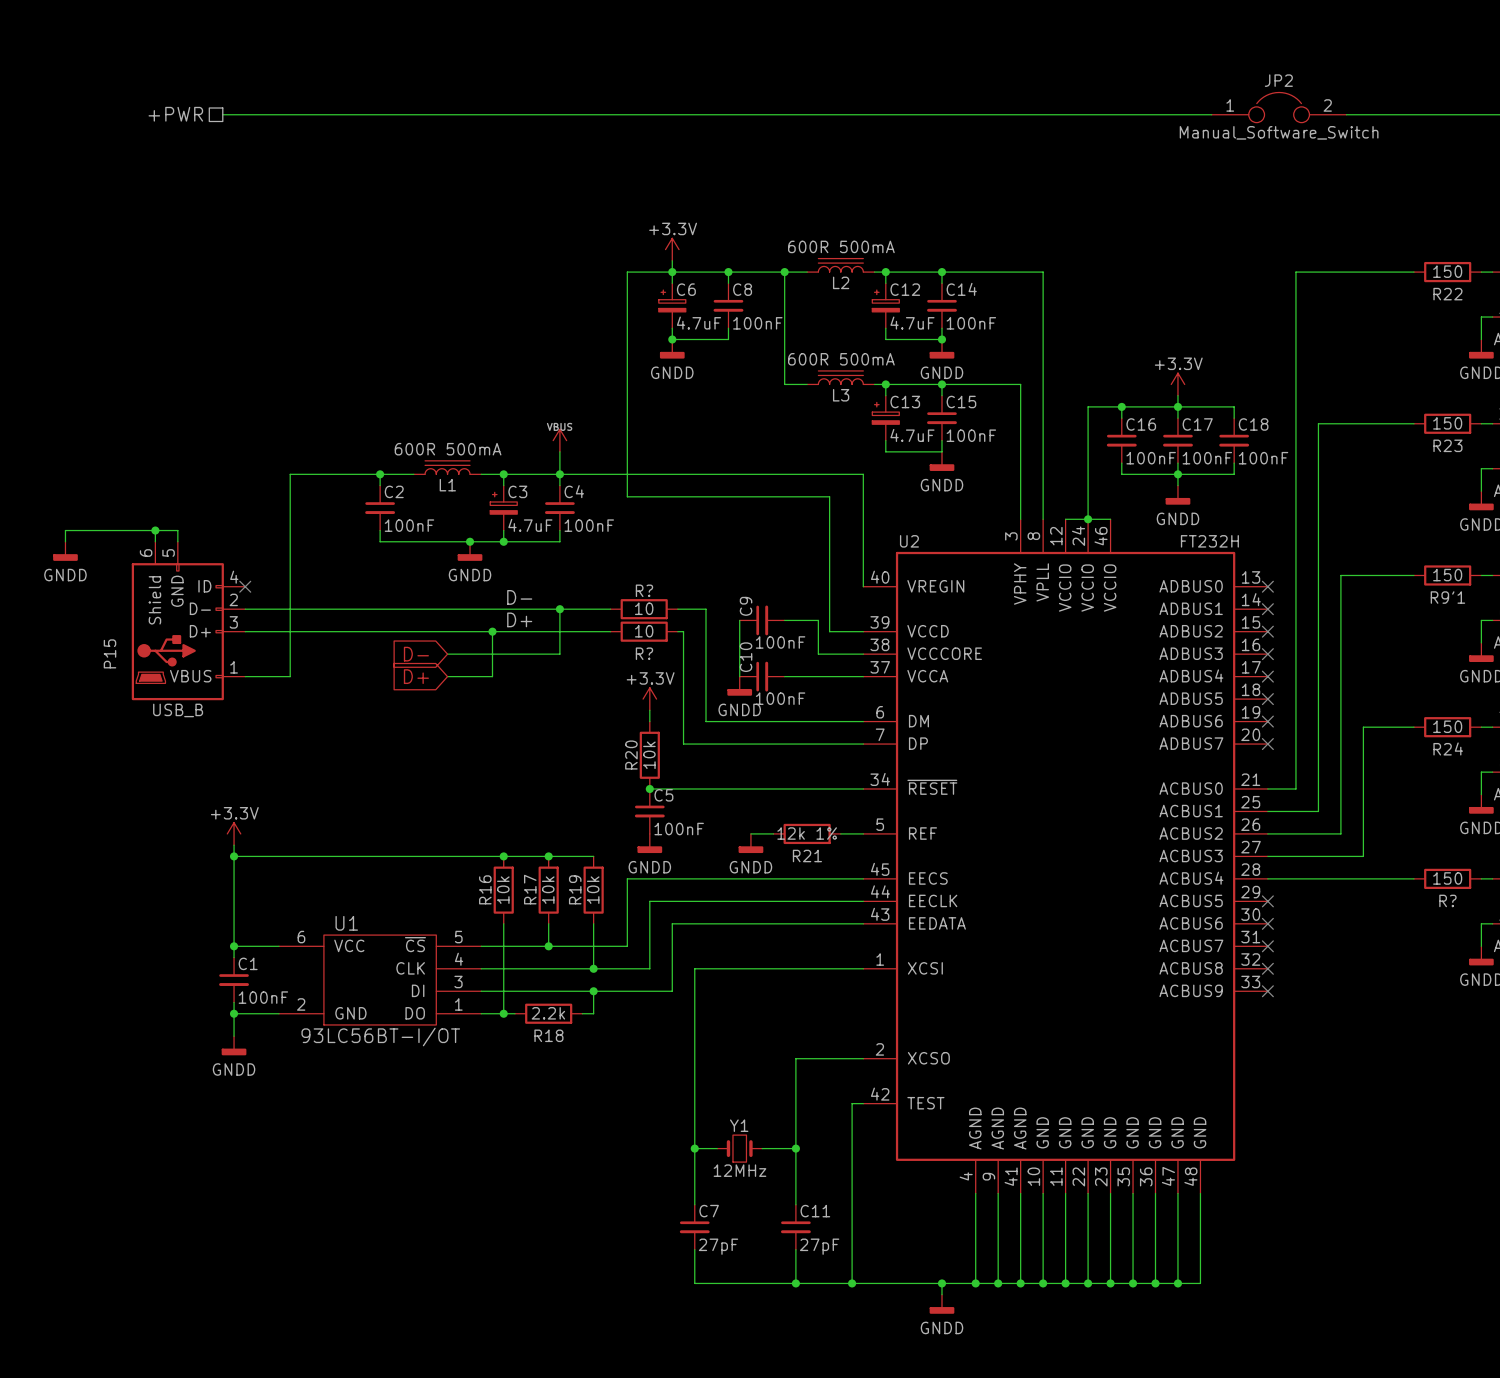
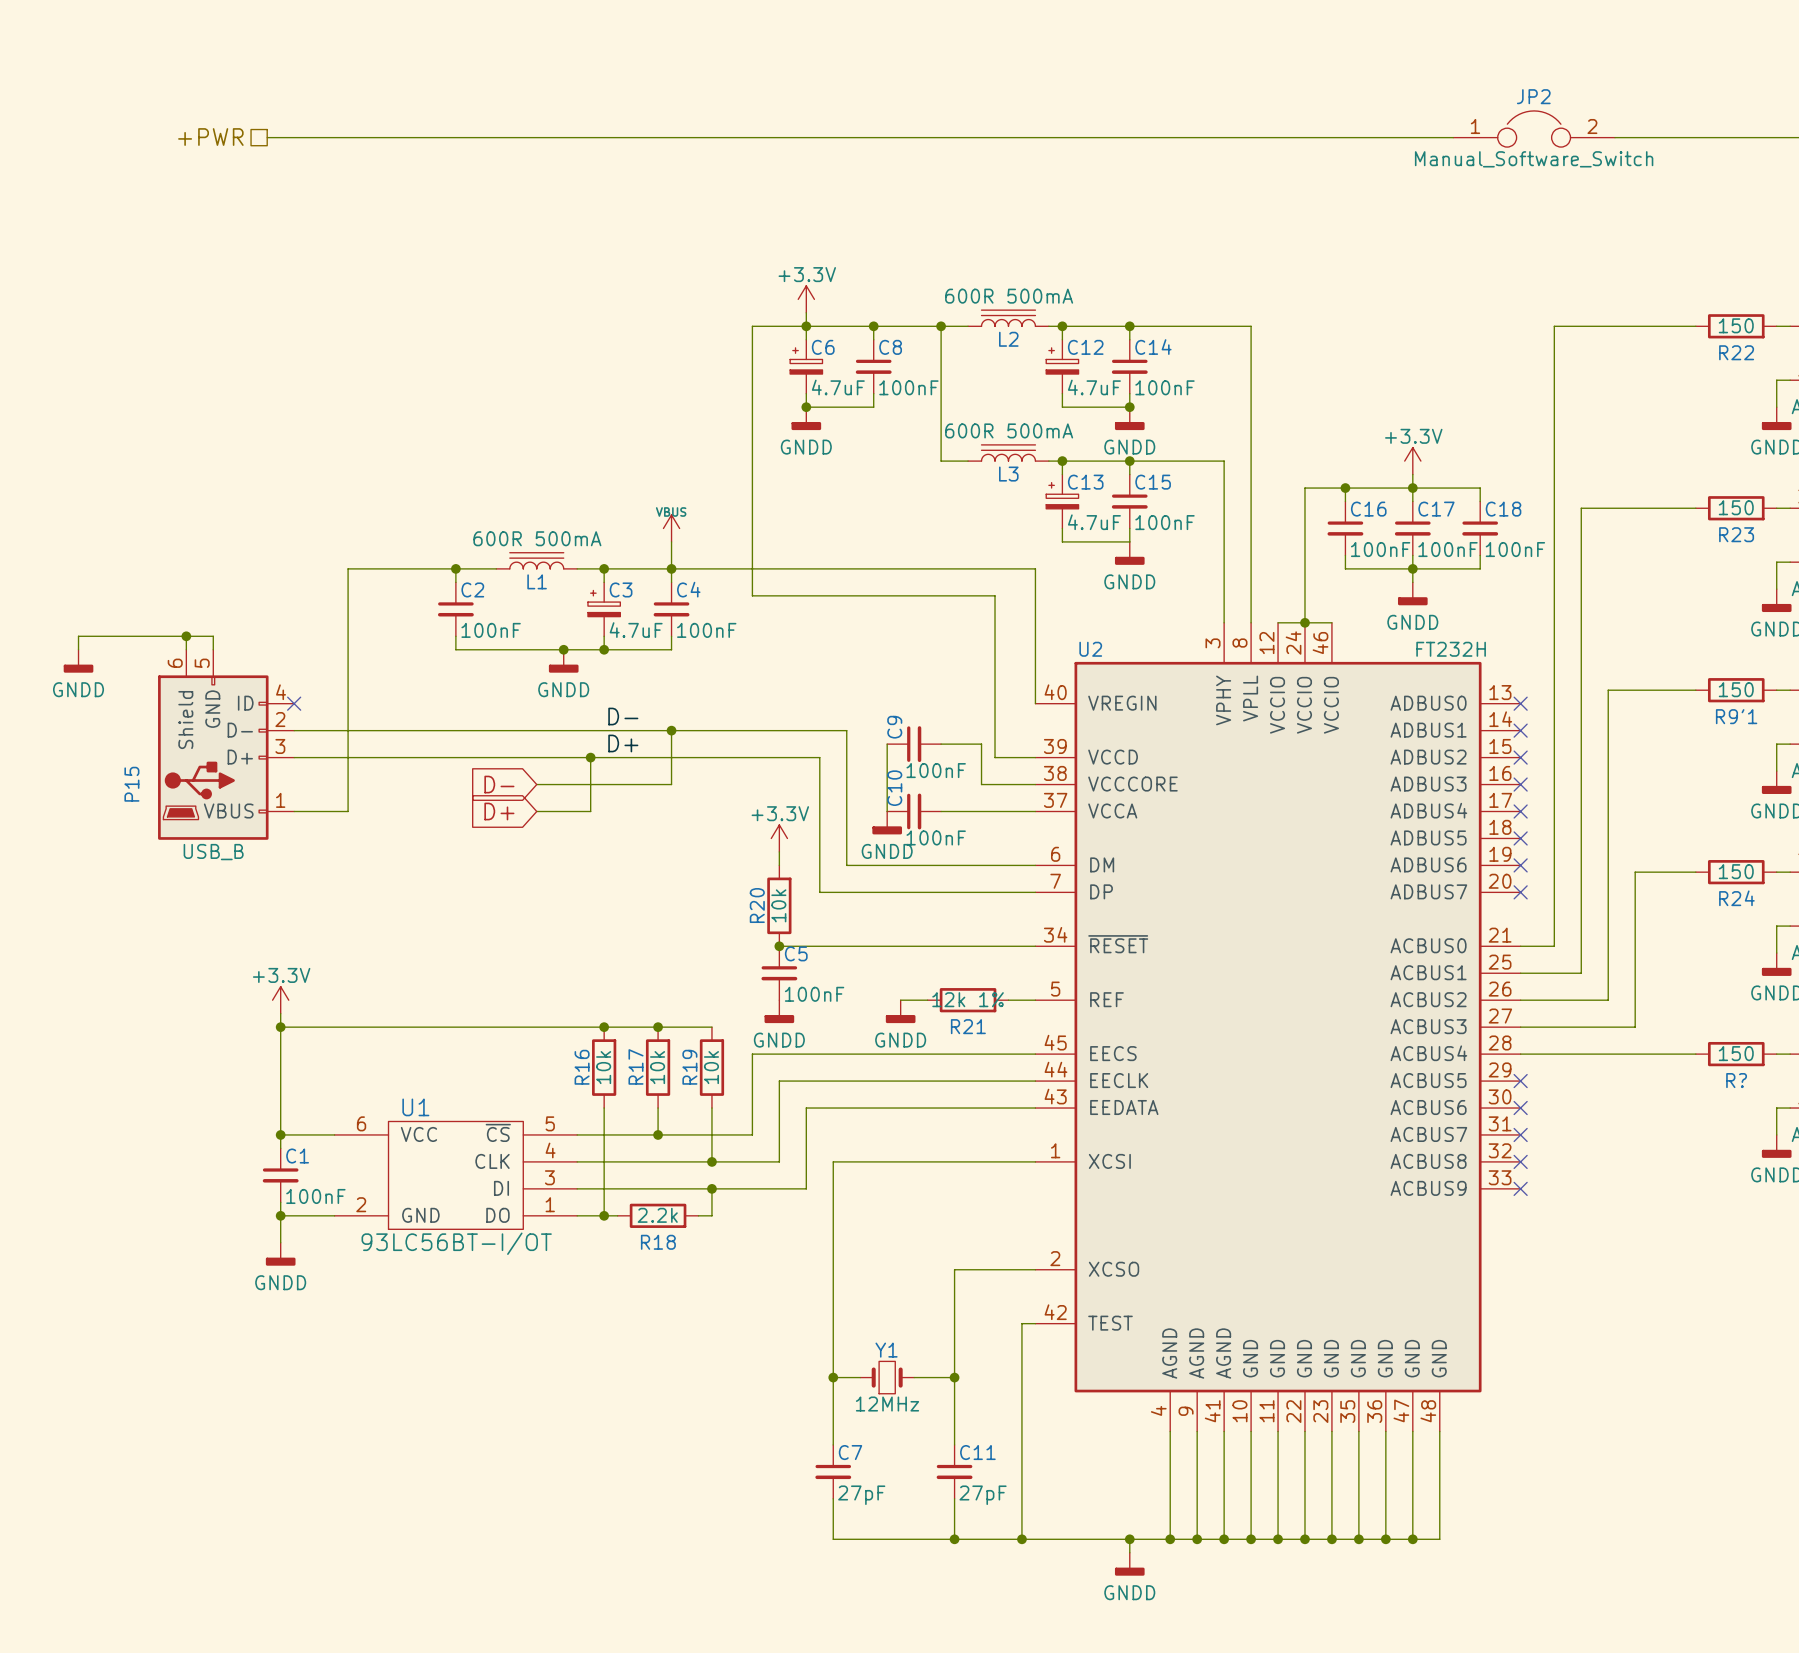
wire: none -> (732, 730) (813, 730)
R?: 10 (644, 609) -> none
wire: none -> (732, 757) (813, 757)
R?: 10 (644, 631) -> none

